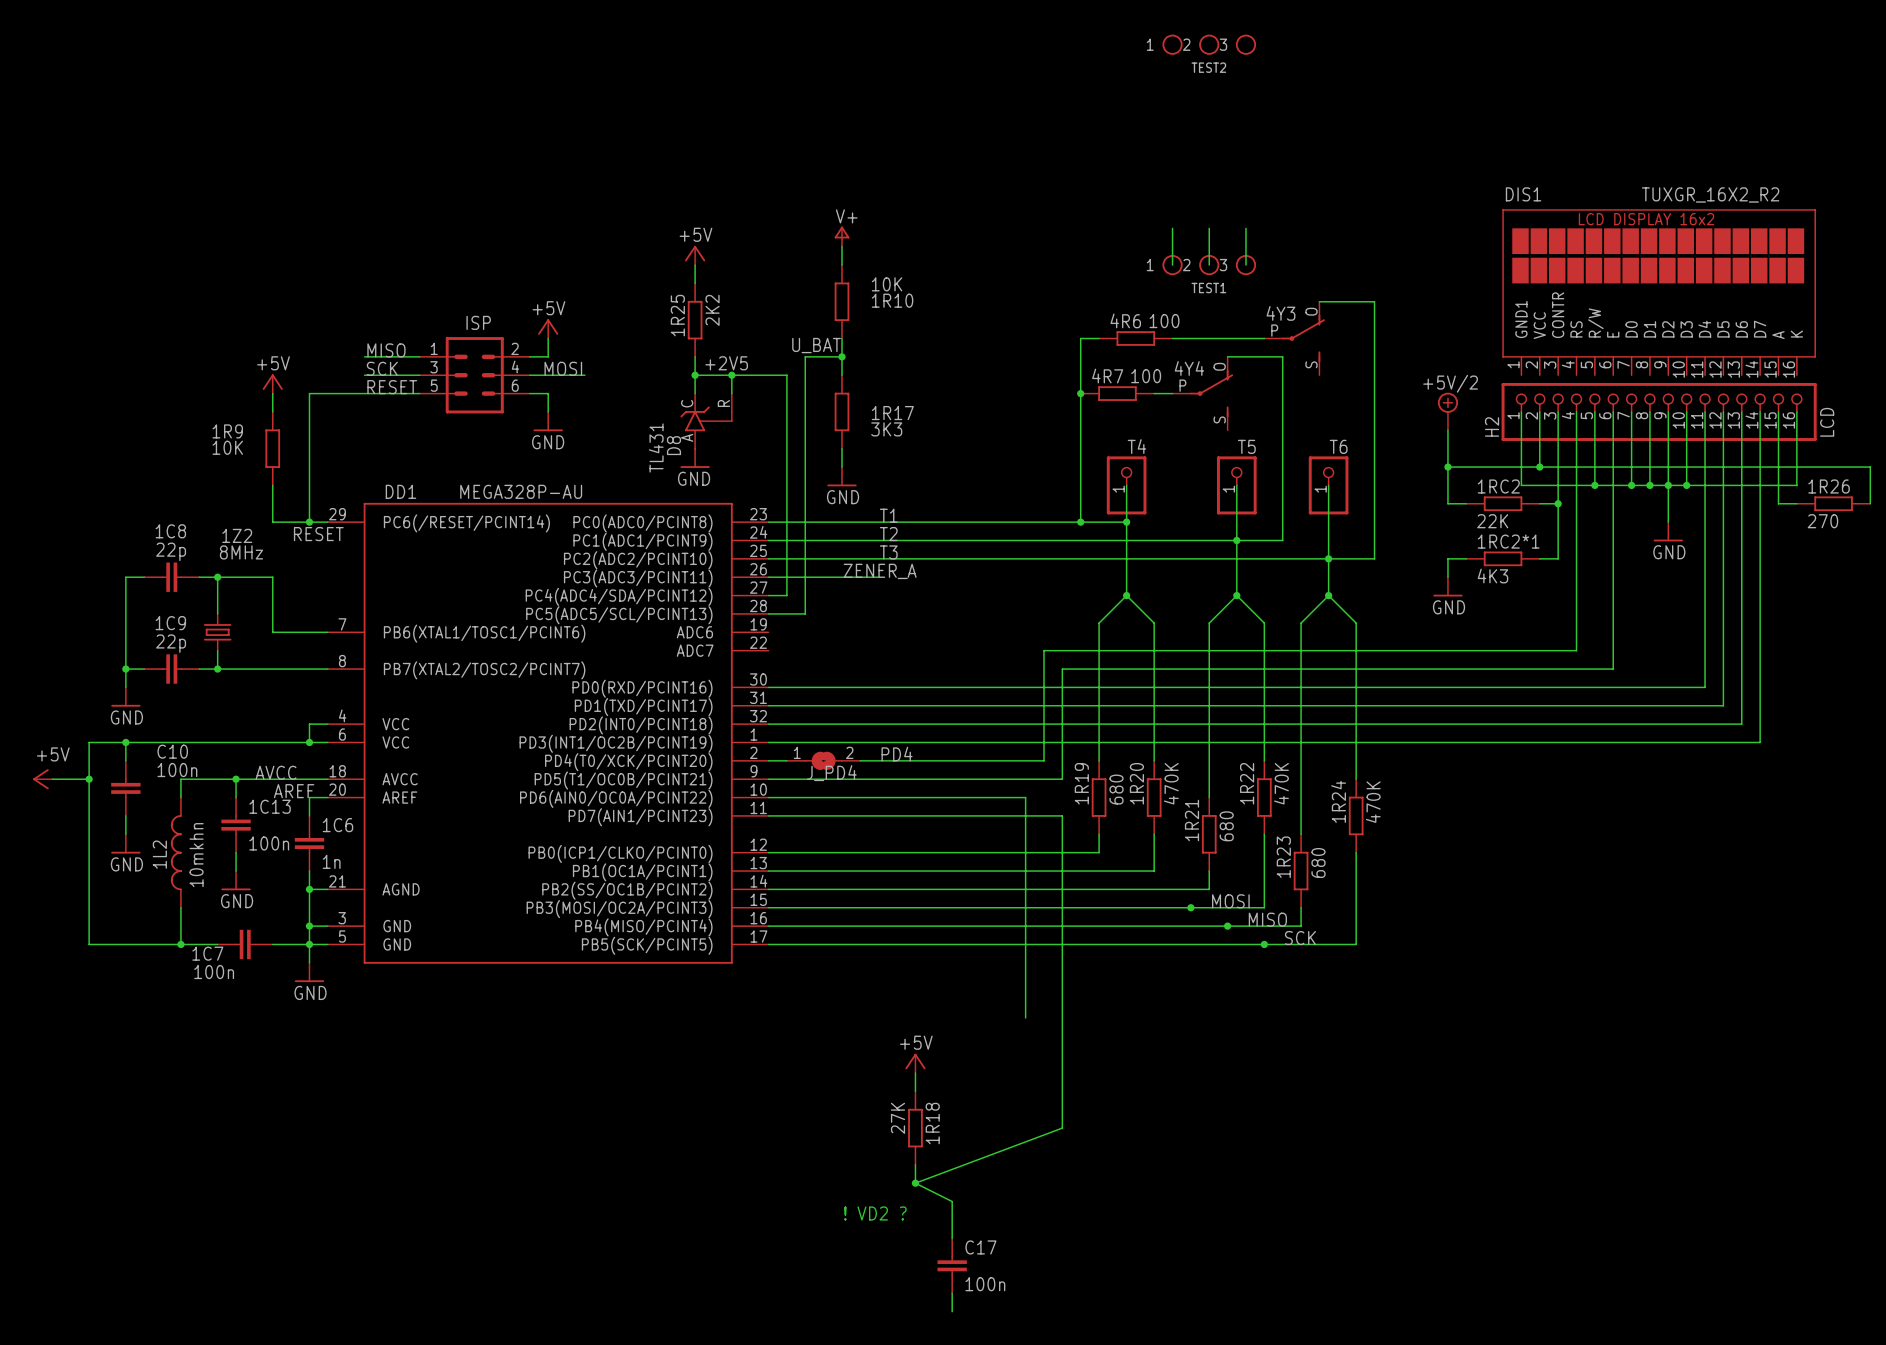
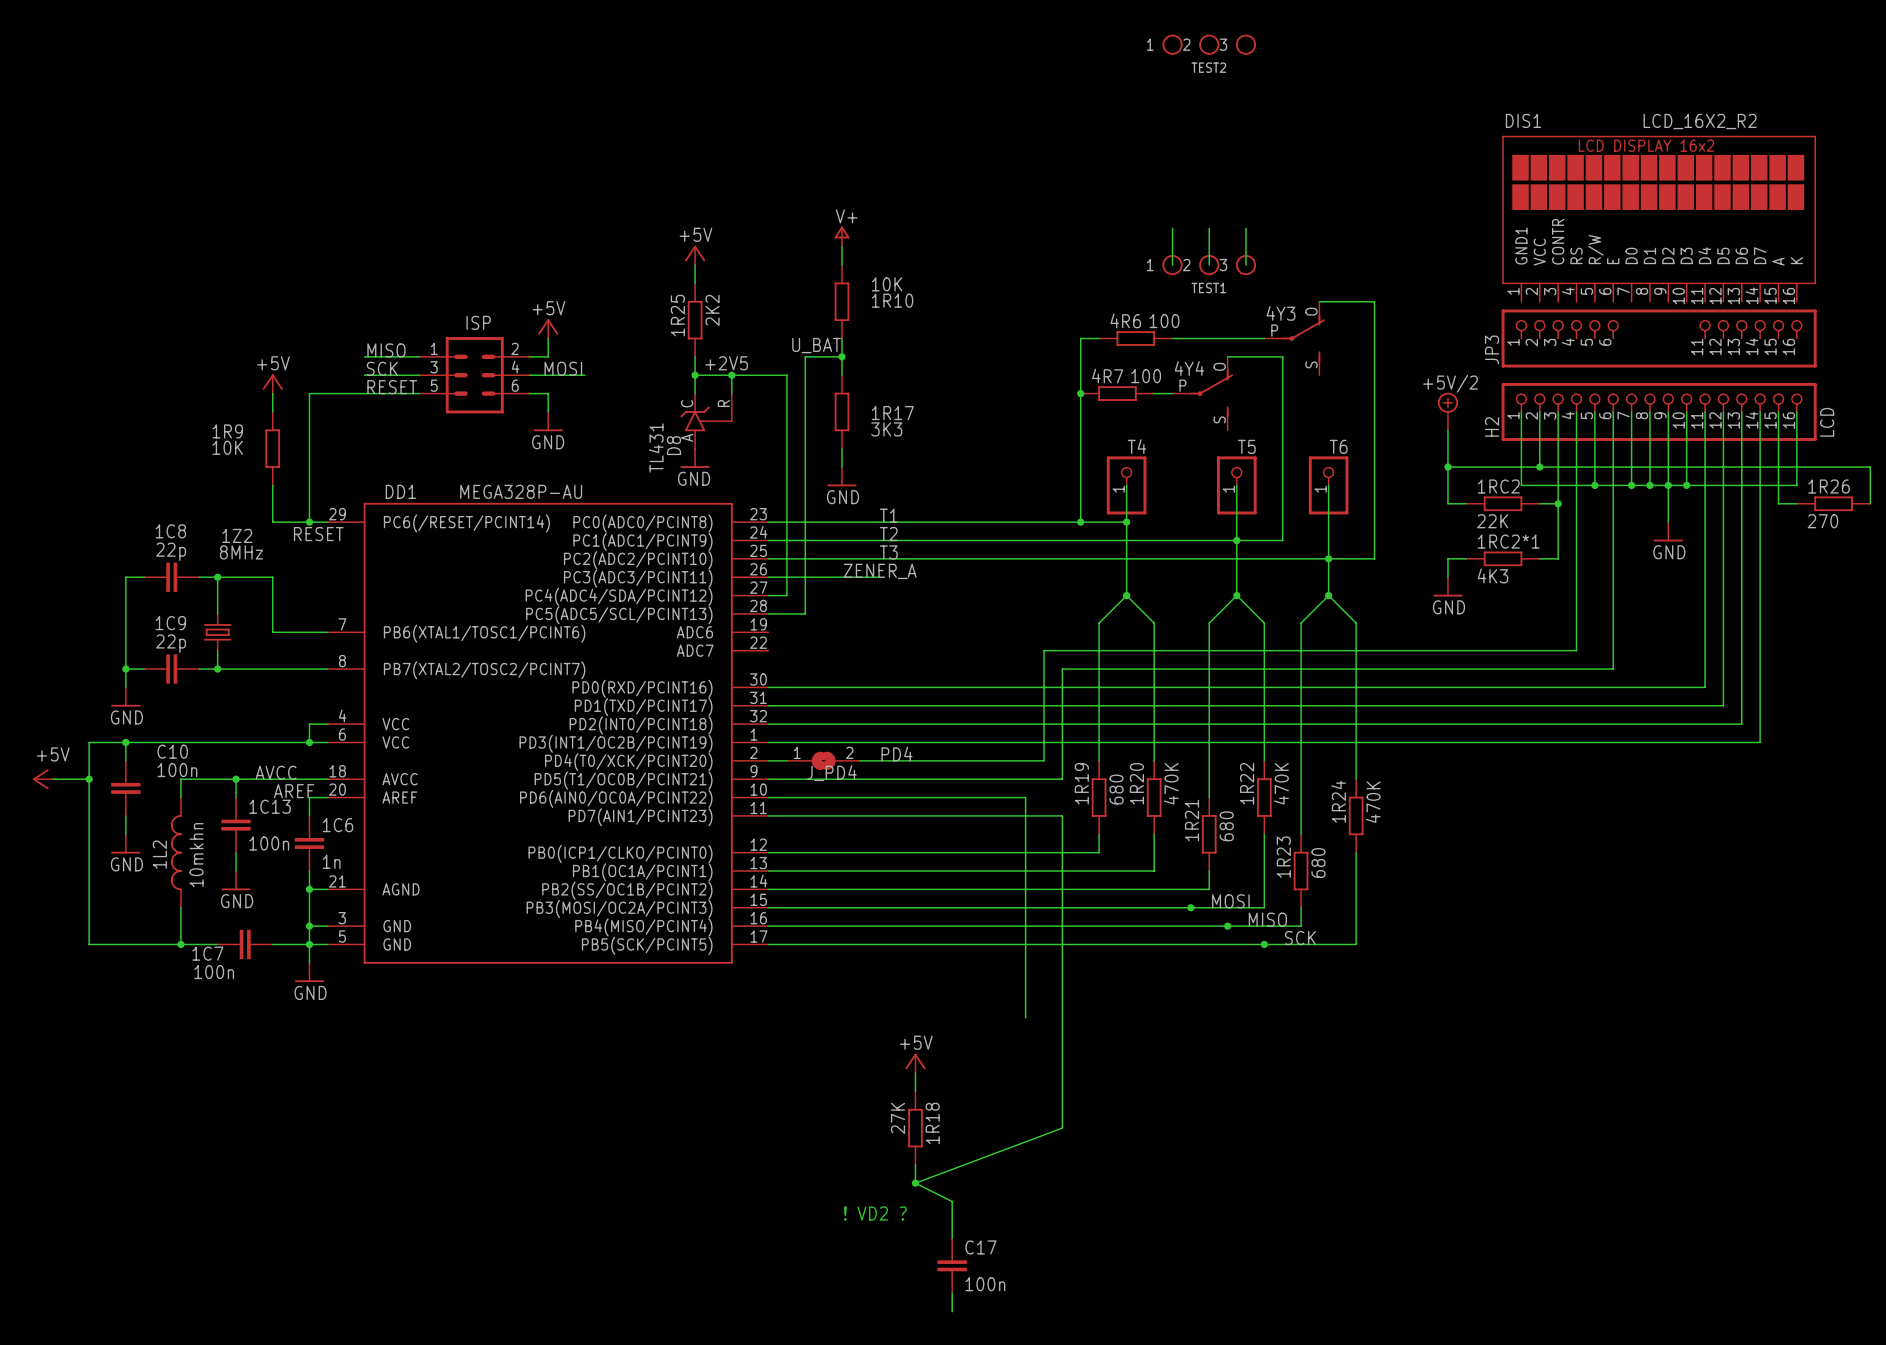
DIS1 value: TUXGR_16X2_R2 (1710, 194) -> LCD_16X2_R2 (1700, 121)
DIS1 position: (1659, 292) -> (1659, 218)
JP3: none -> (1659, 338)

